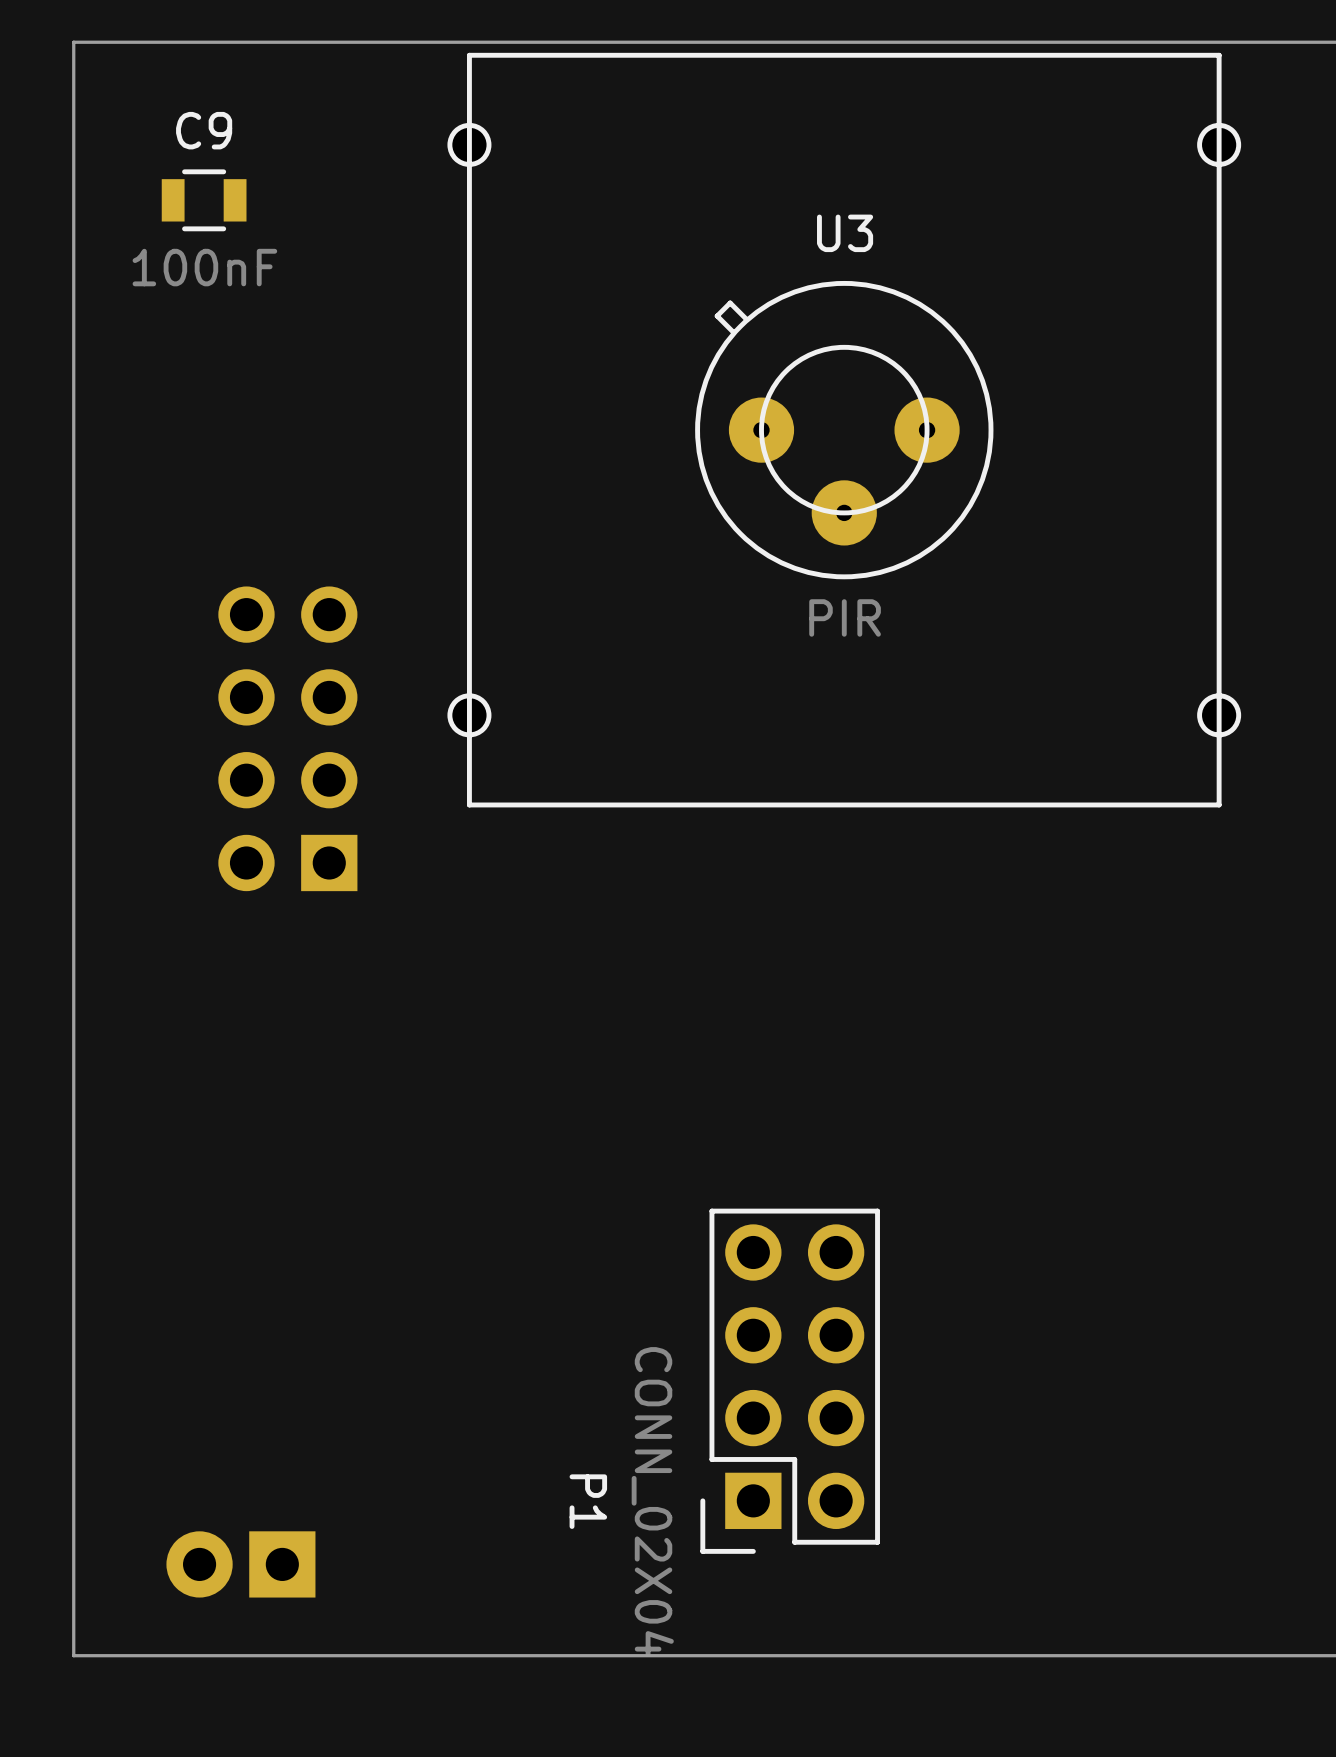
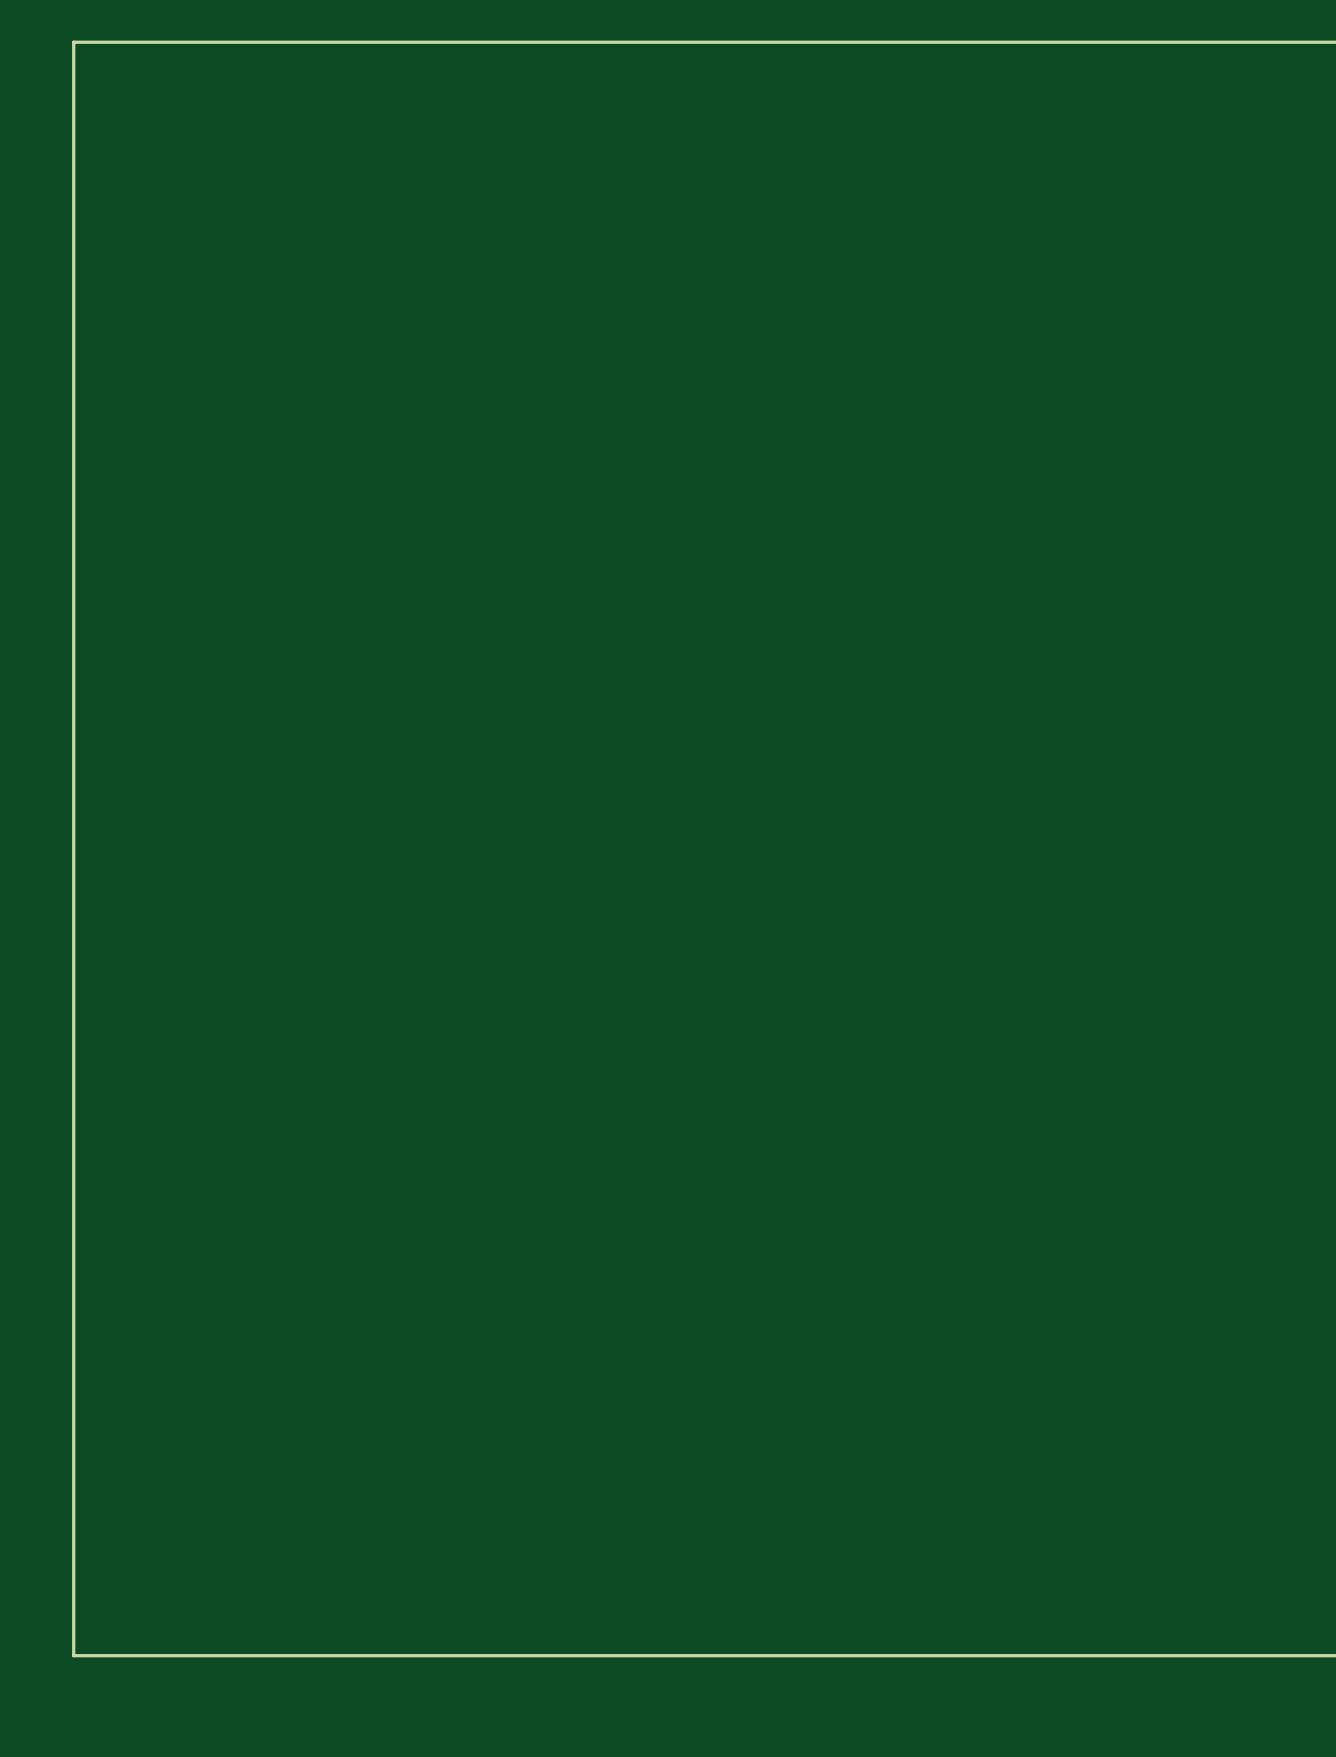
C9: 100nF (204, 200) -> none
U3: PIR (844, 430) -> none
part: (287, 738) -> none
P1: CONN_02X04 (790, 1381) -> none
part: (240, 1564) -> none

